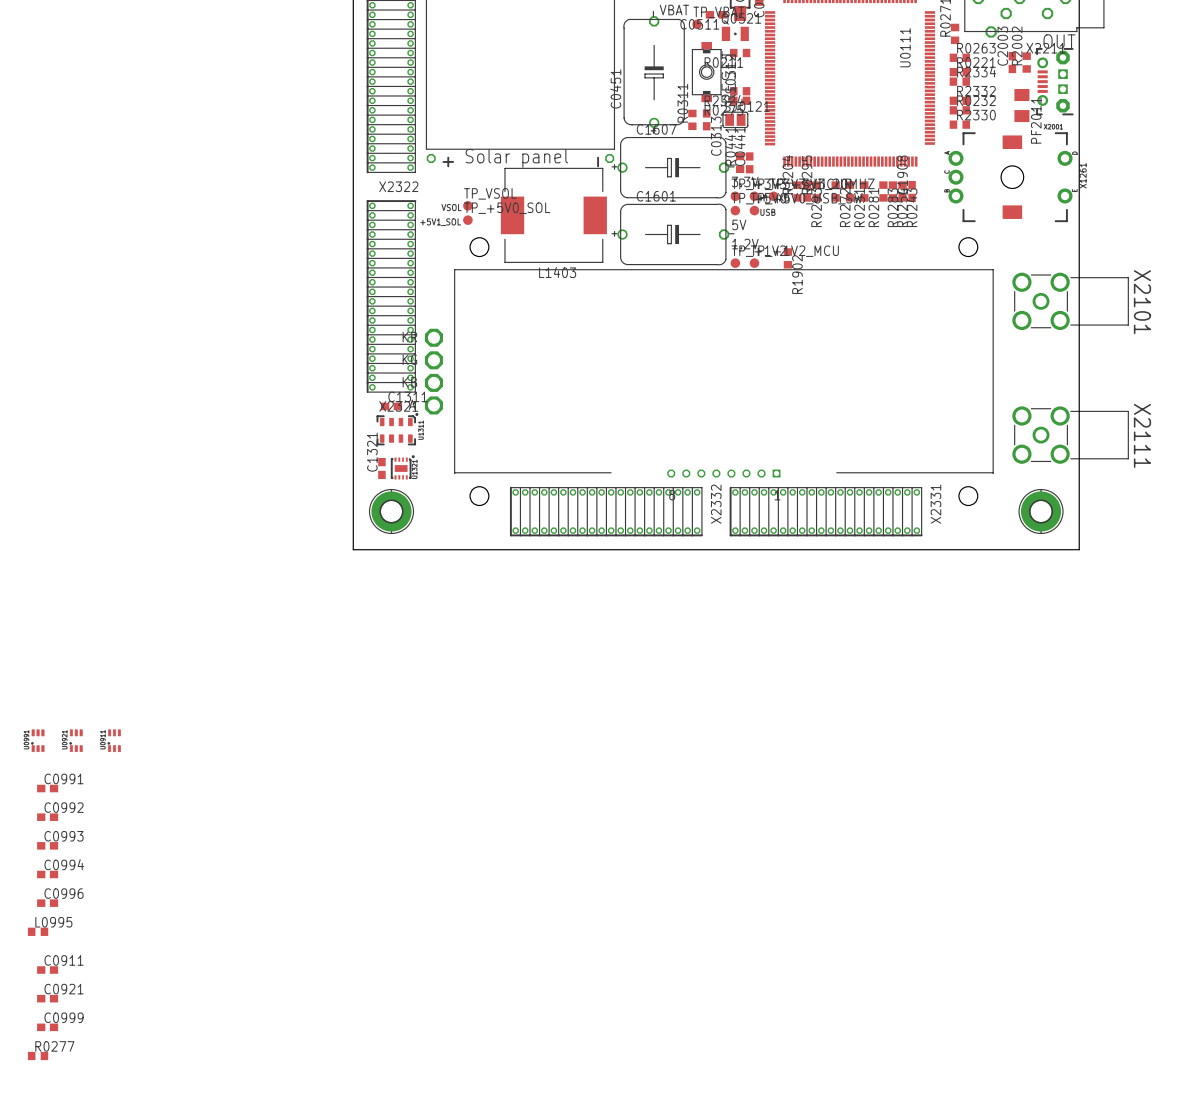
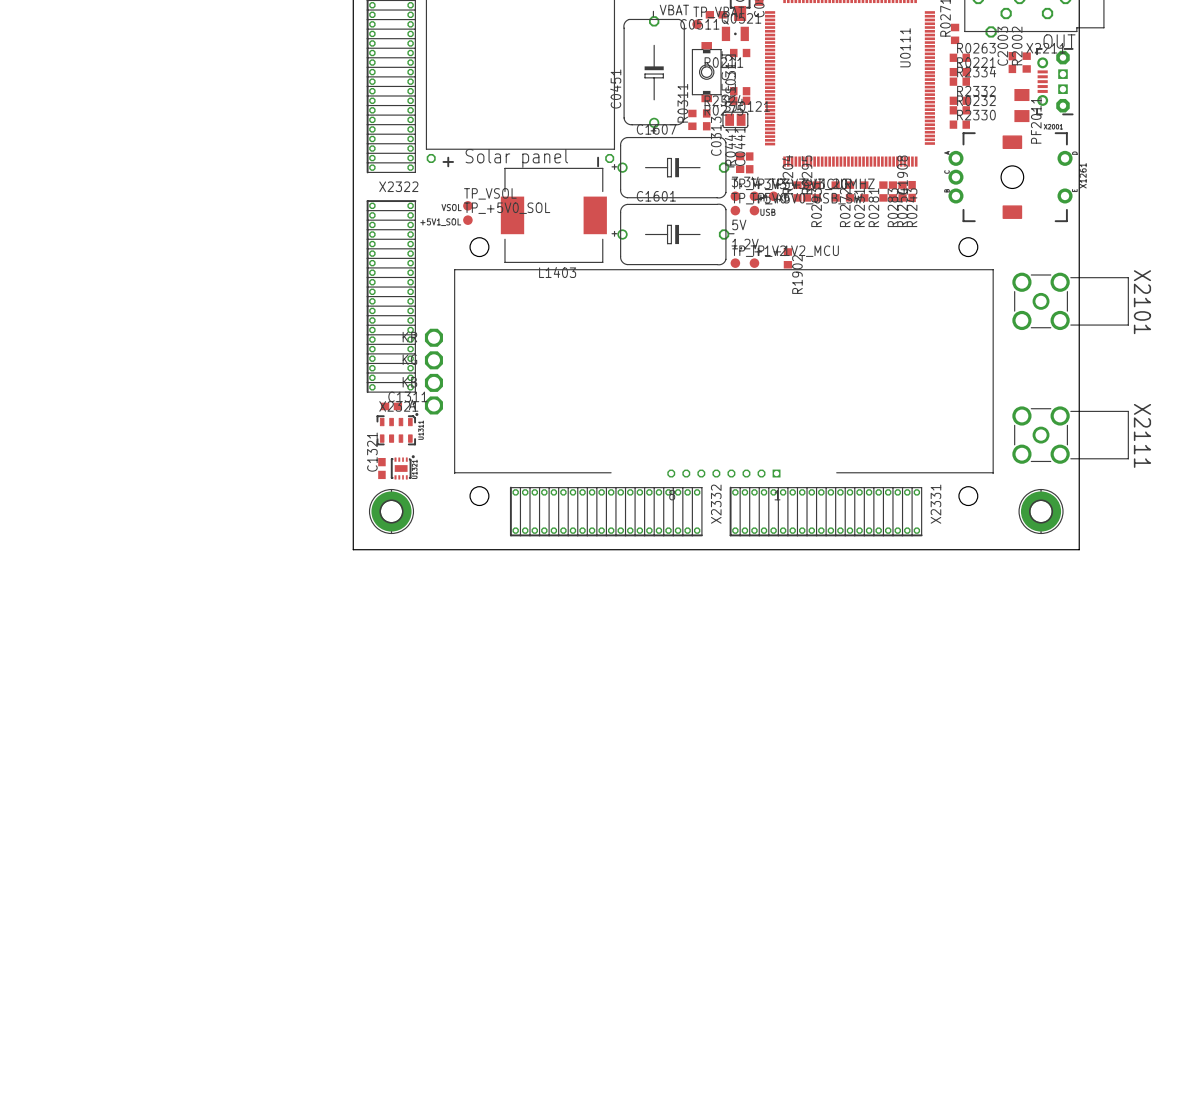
part: (38, 740) -> none
part: (76, 740) -> none
part: (114, 740) -> none
C0991: (47, 788) -> none
C0992: (47, 817) -> none
C0993: (47, 845) -> none
C0994: (47, 874) -> none
C0996: (47, 903) -> none
L0995: (38, 931) -> none
C0911: (47, 970) -> none
C0921: (47, 998) -> none
C0999: (47, 1027) -> none
R0277: (38, 1055) -> none

